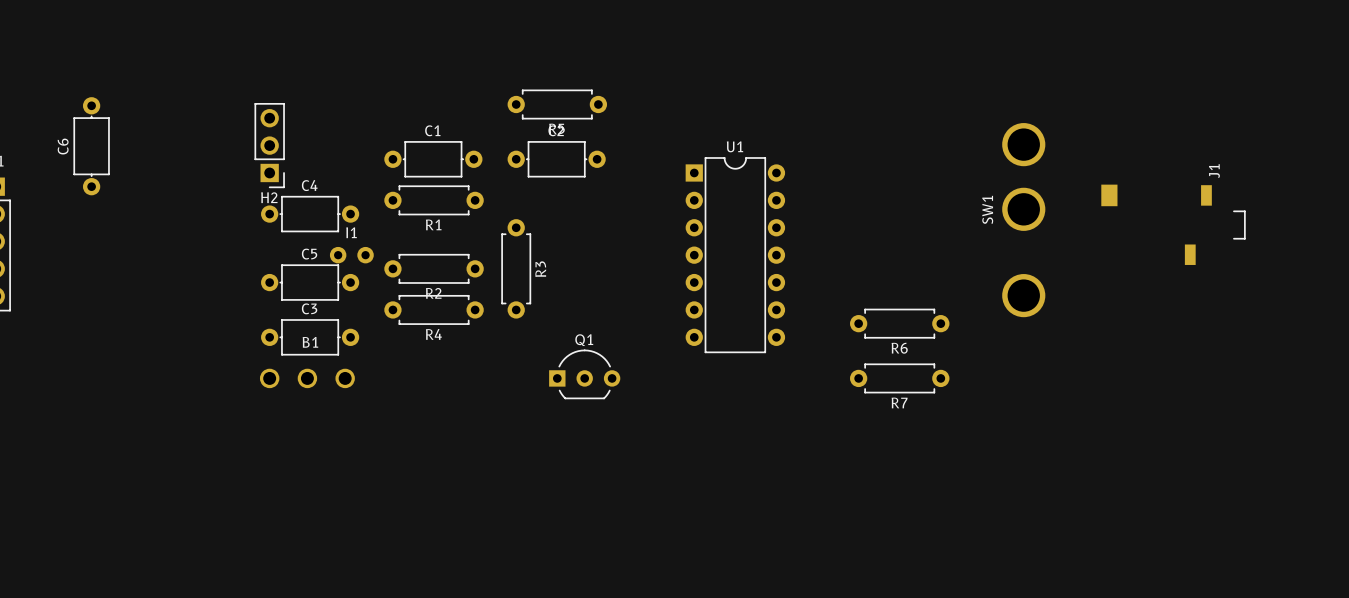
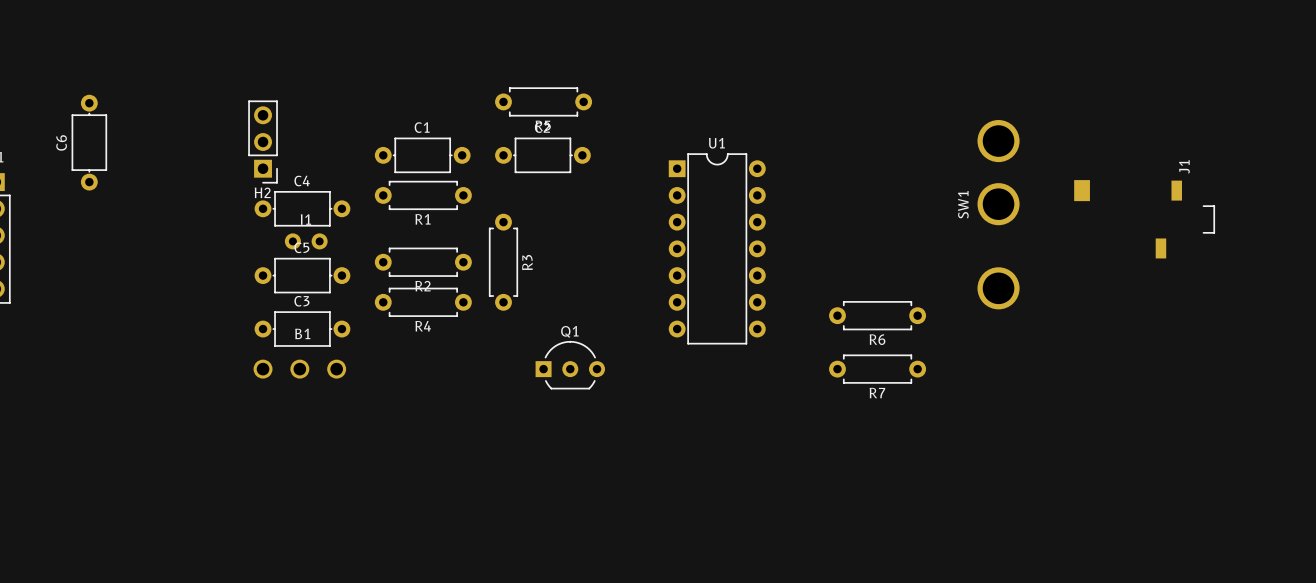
I1 position: (351, 255) -> (306, 241)

